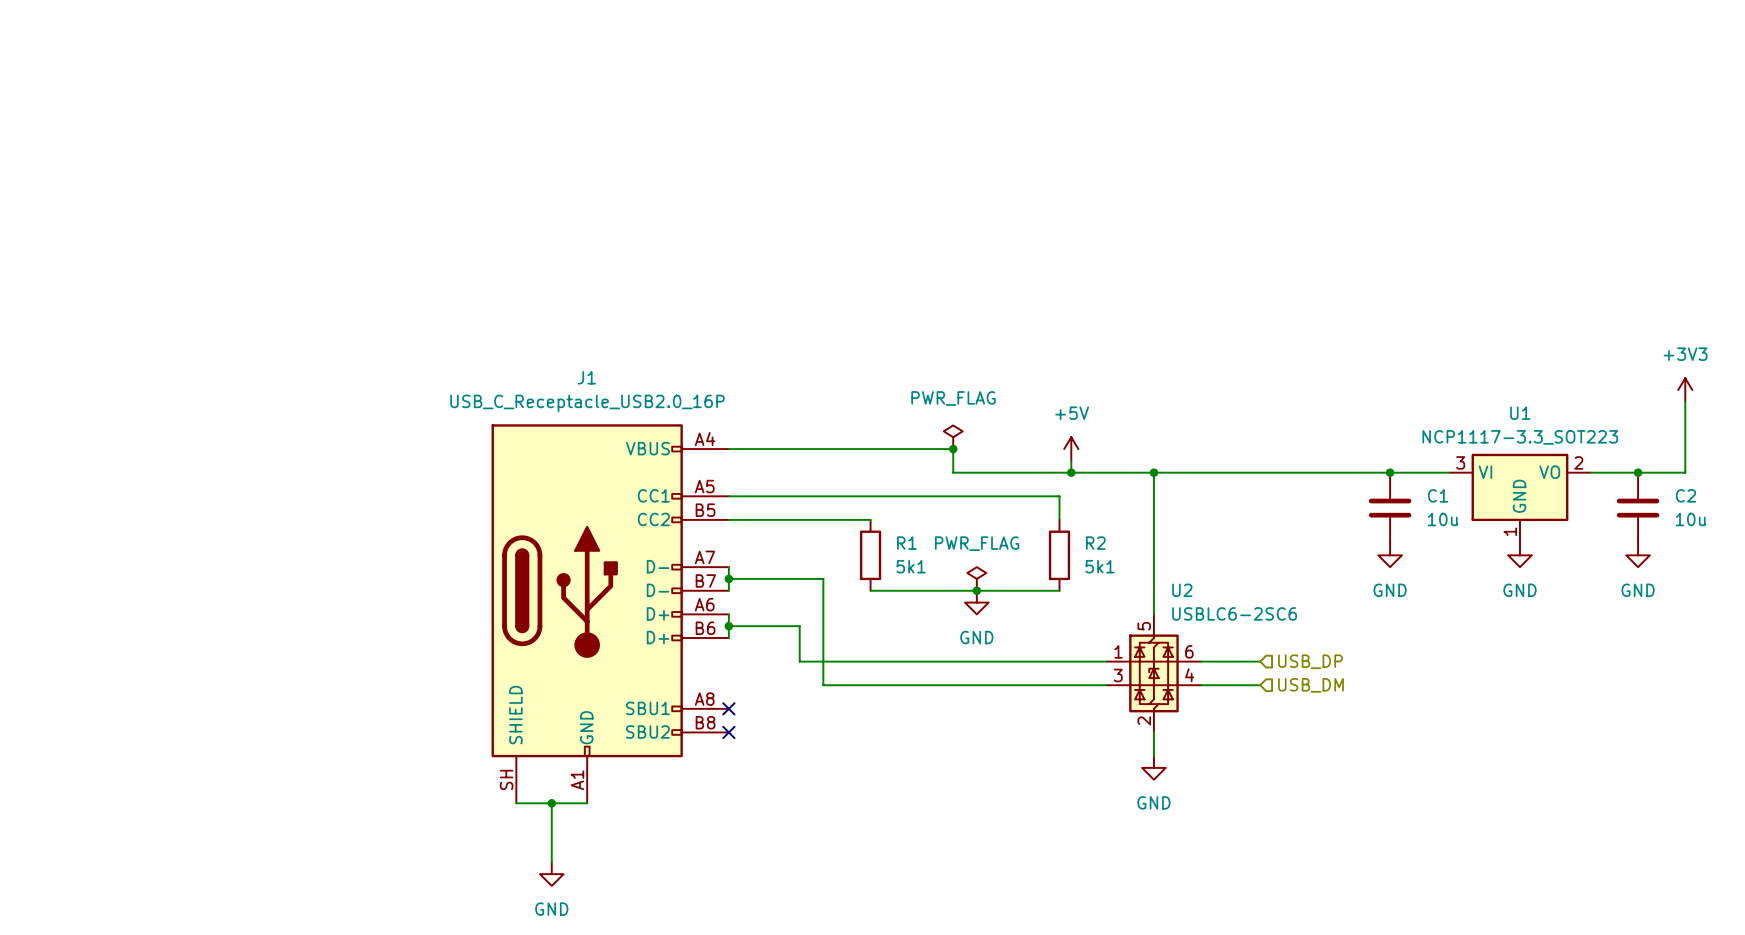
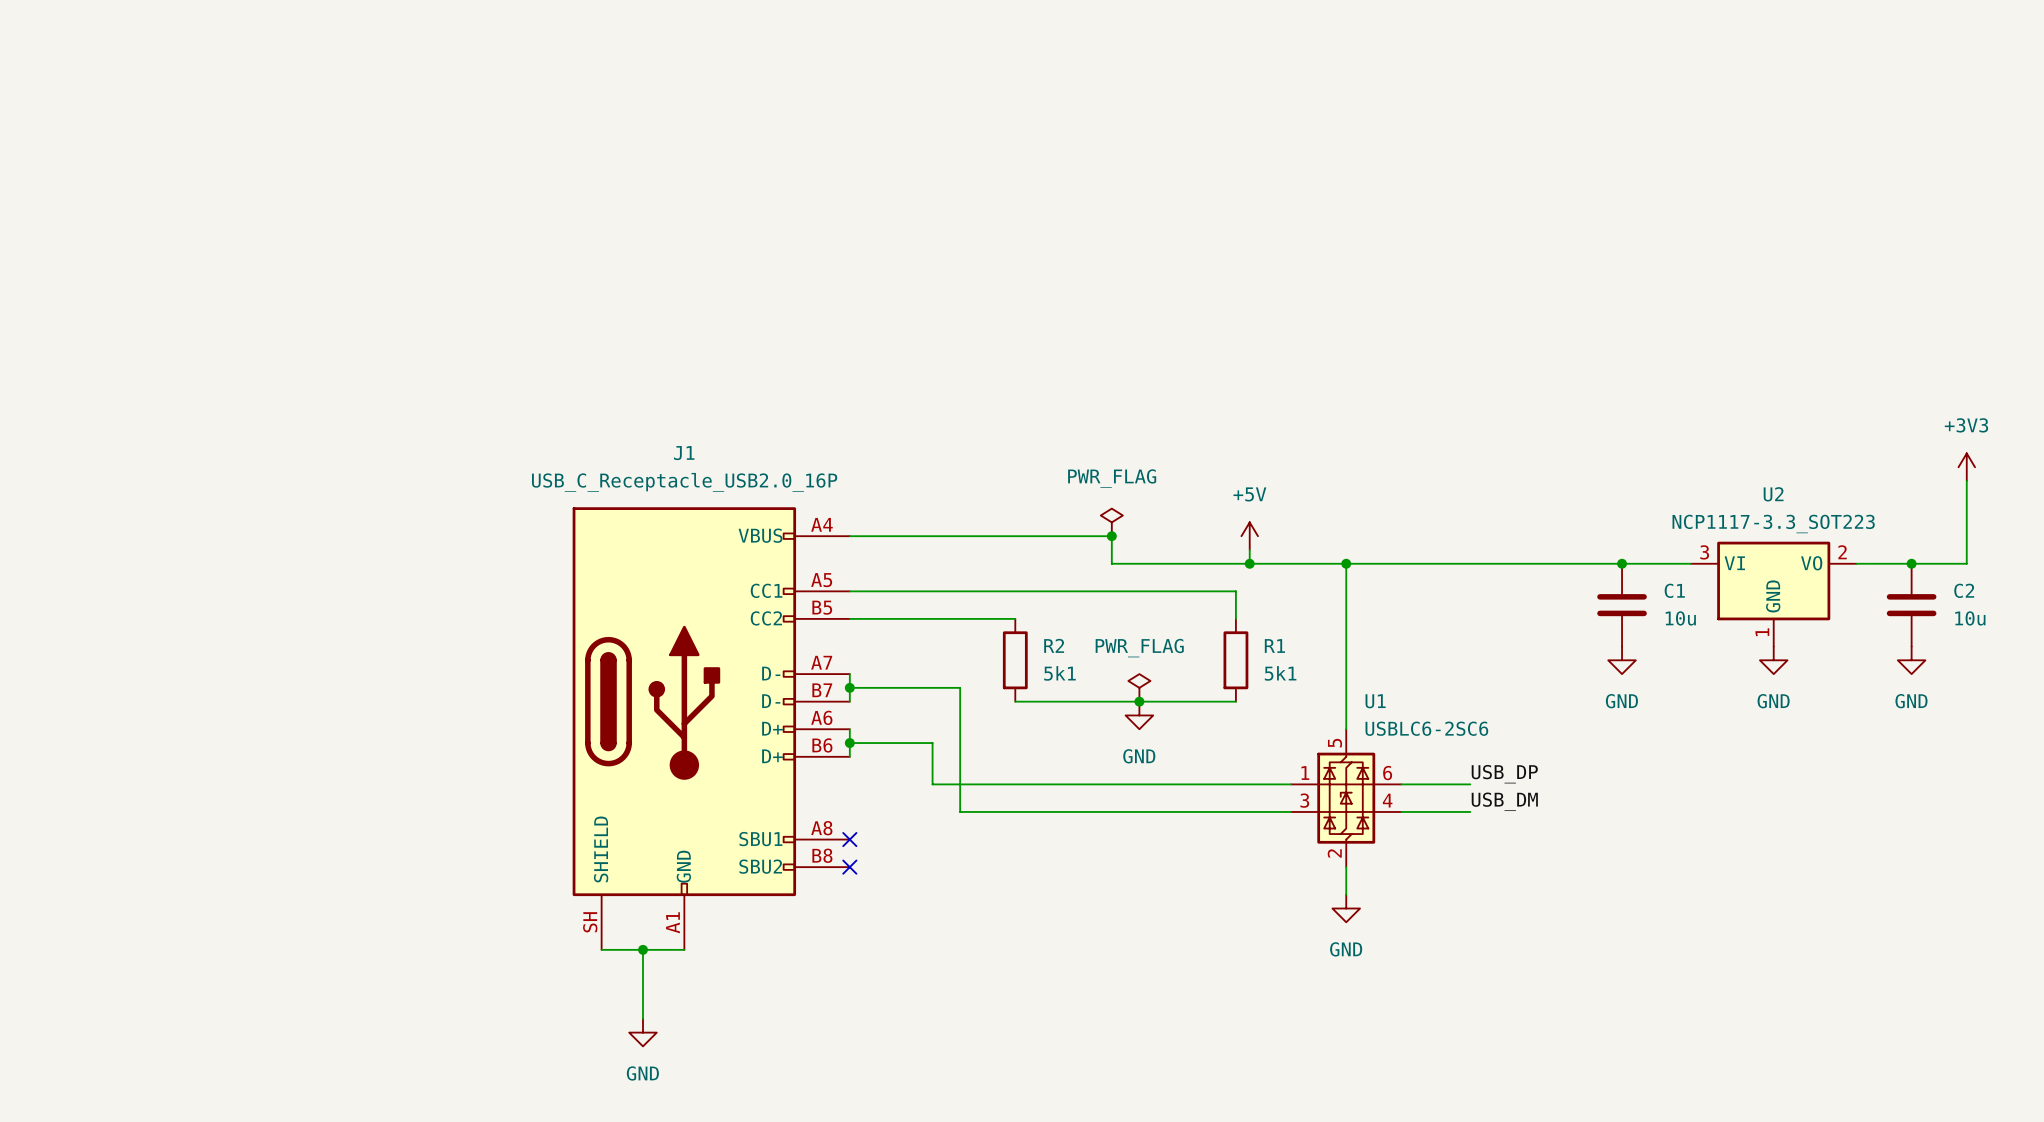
U1 name: U1 (1520, 413) -> U2 (1773, 494)
R1 name: R1 (906, 543) -> R2 (1054, 645)
R2 name: R2 (1095, 543) -> R1 (1274, 645)
U2 name: U2 (1182, 590) -> U1 (1375, 701)
label: none -> USB_DP (1504, 774)
hierarchical label: USB_DP (1310, 661) -> none
label: none -> USB_DM (1504, 801)
hierarchical label: USB_DM (1311, 685) -> none

